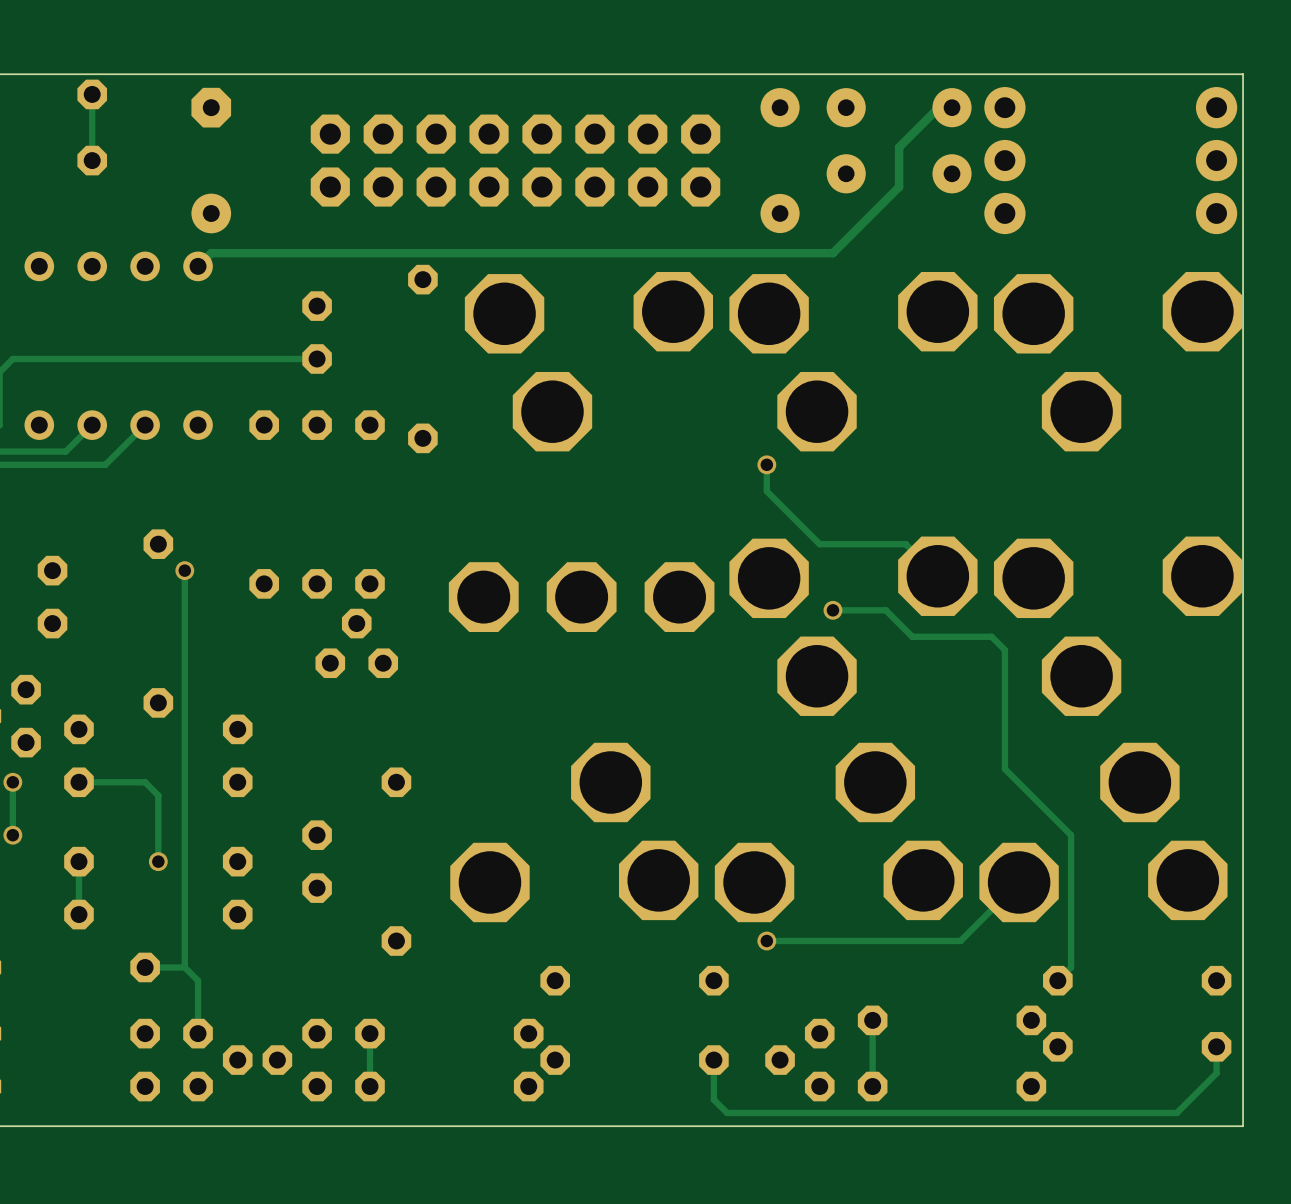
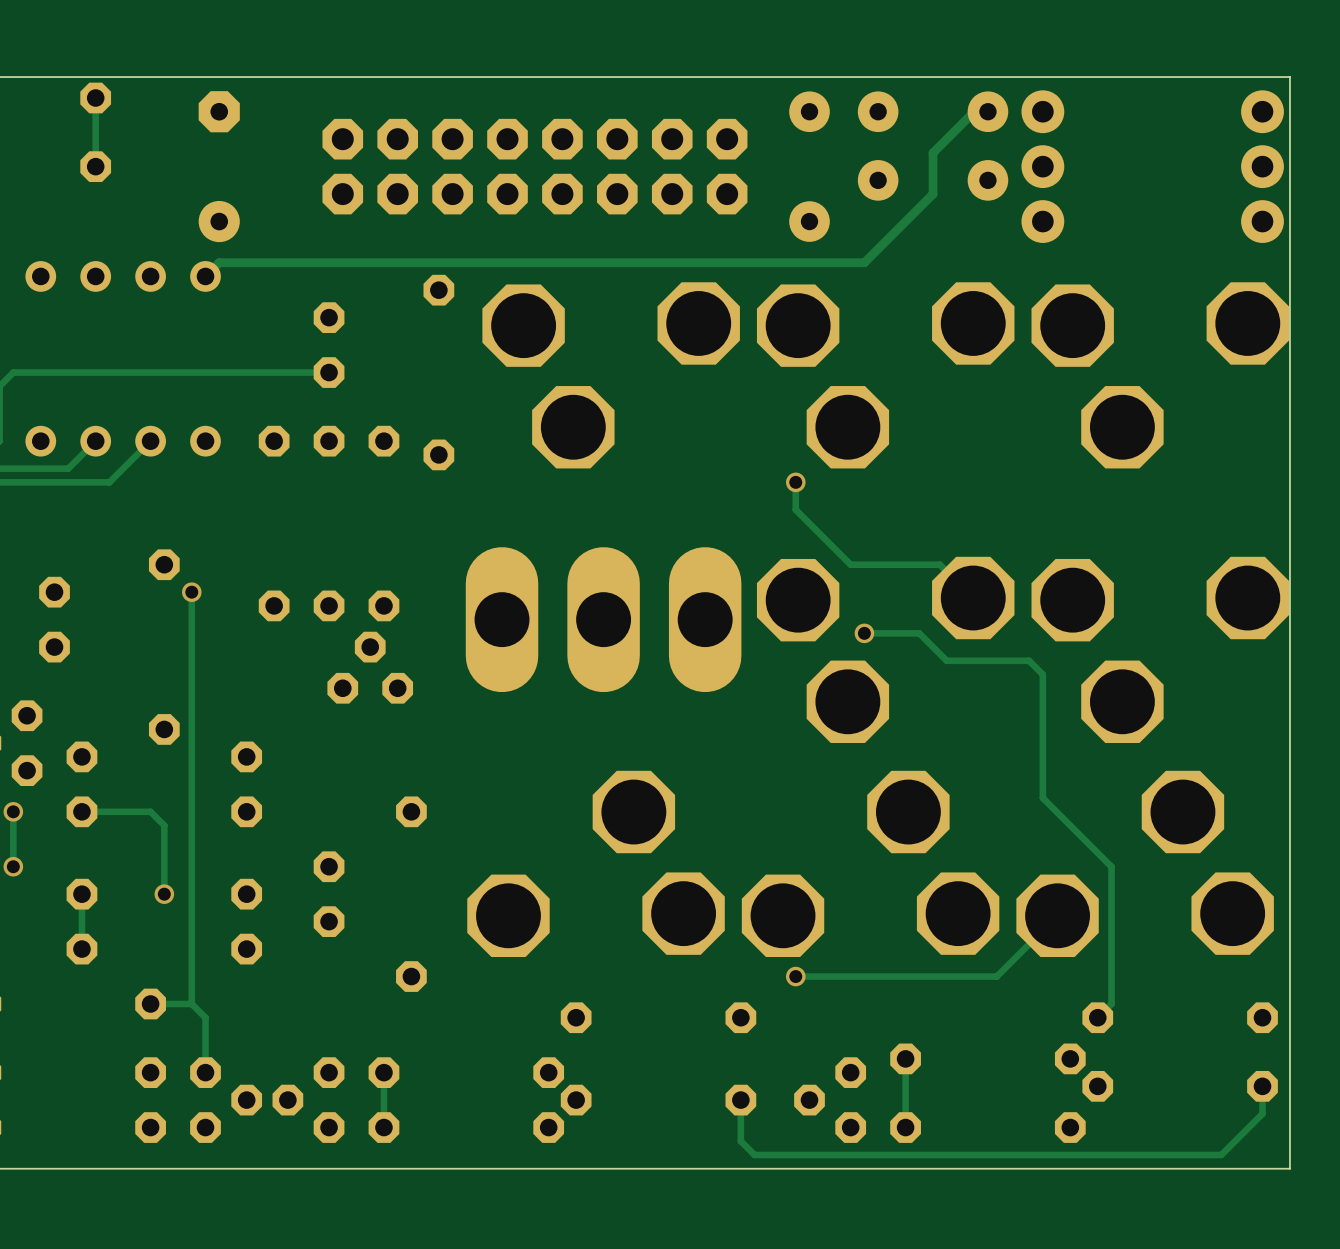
part footprint: [448, 562, 715, 633] -> [465, 547, 742, 693]

